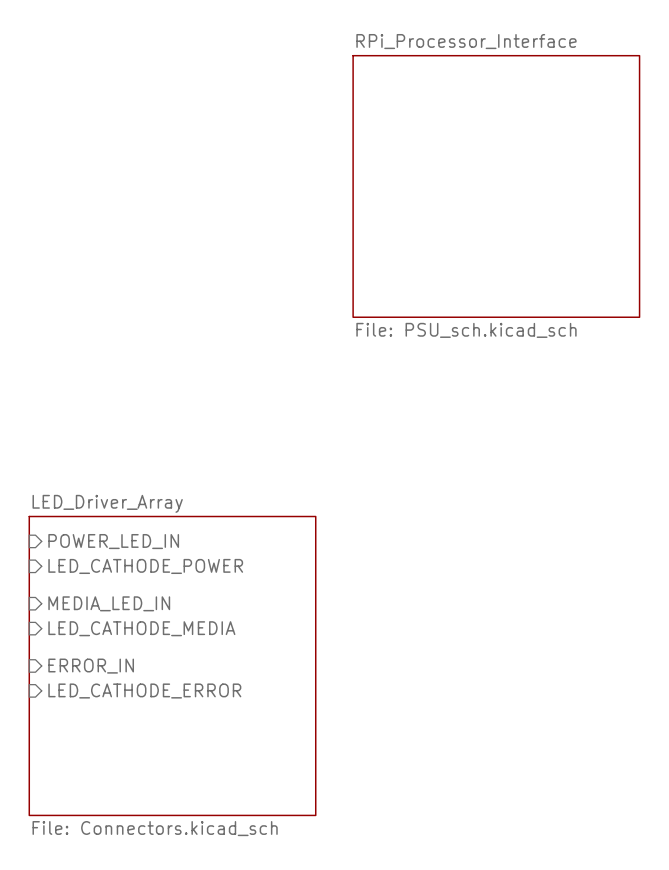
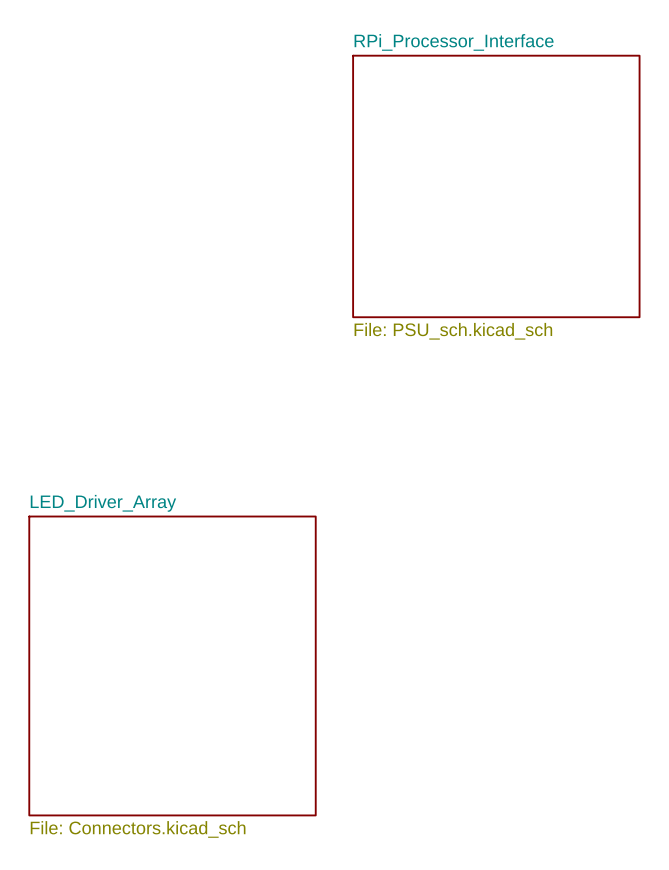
sheet pin: POWER_LED_IN (113, 541) -> none
sheet pin: LED_CATHODE_POWER (145, 566) -> none
sheet pin: MEDIA_LED_IN (109, 603) -> none
sheet pin: LED_CATHODE_MEDIA (141, 628) -> none
sheet pin: ERROR_IN (91, 666) -> none
sheet pin: LED_CATHODE_ERROR (144, 691) -> none

